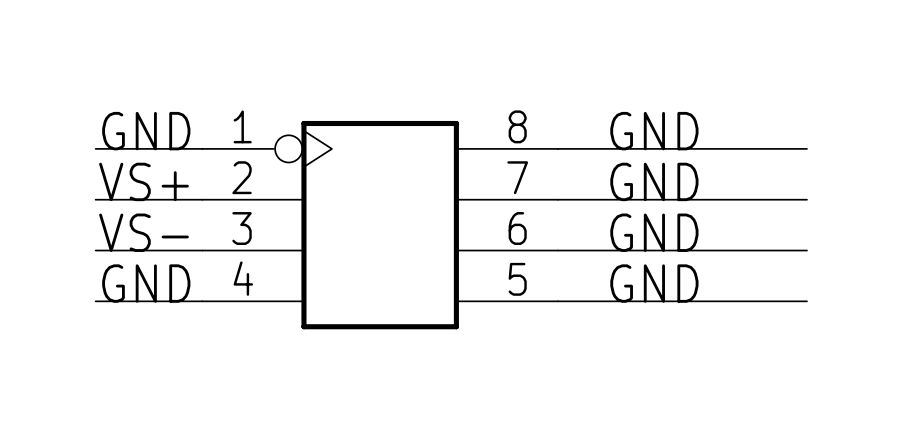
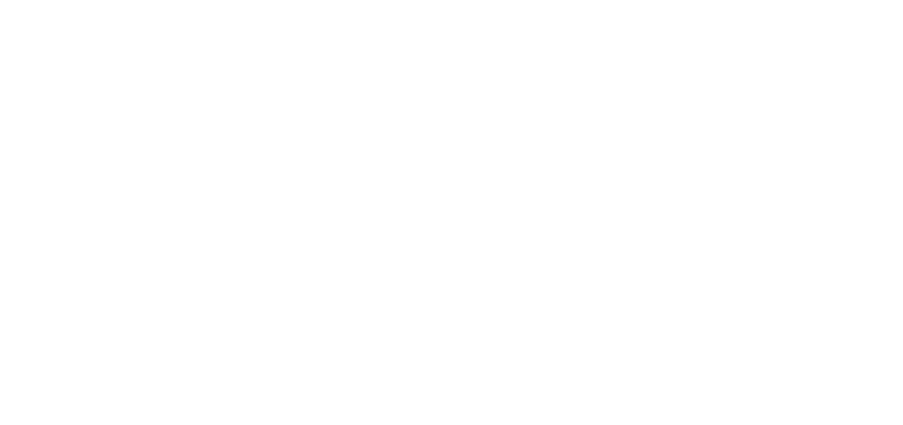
label: GND (146, 131) -> none
label: GND (654, 131) -> none
wire: (95, 148) (202, 148) -> none
wire: (558, 148) (806, 148) -> none
label: VS+ (144, 181) -> none
label: GND (654, 181) -> none
wire: (95, 199) (202, 199) -> none
wire: (558, 199) (806, 199) -> none
part: (380, 225) -> none
label: VS- (144, 232) -> none
label: GND (654, 232) -> none
wire: (95, 250) (202, 250) -> none
wire: (558, 250) (806, 250) -> none
label: GND (146, 283) -> none
label: GND (654, 283) -> none
wire: (95, 301) (202, 301) -> none
wire: (558, 301) (806, 301) -> none

